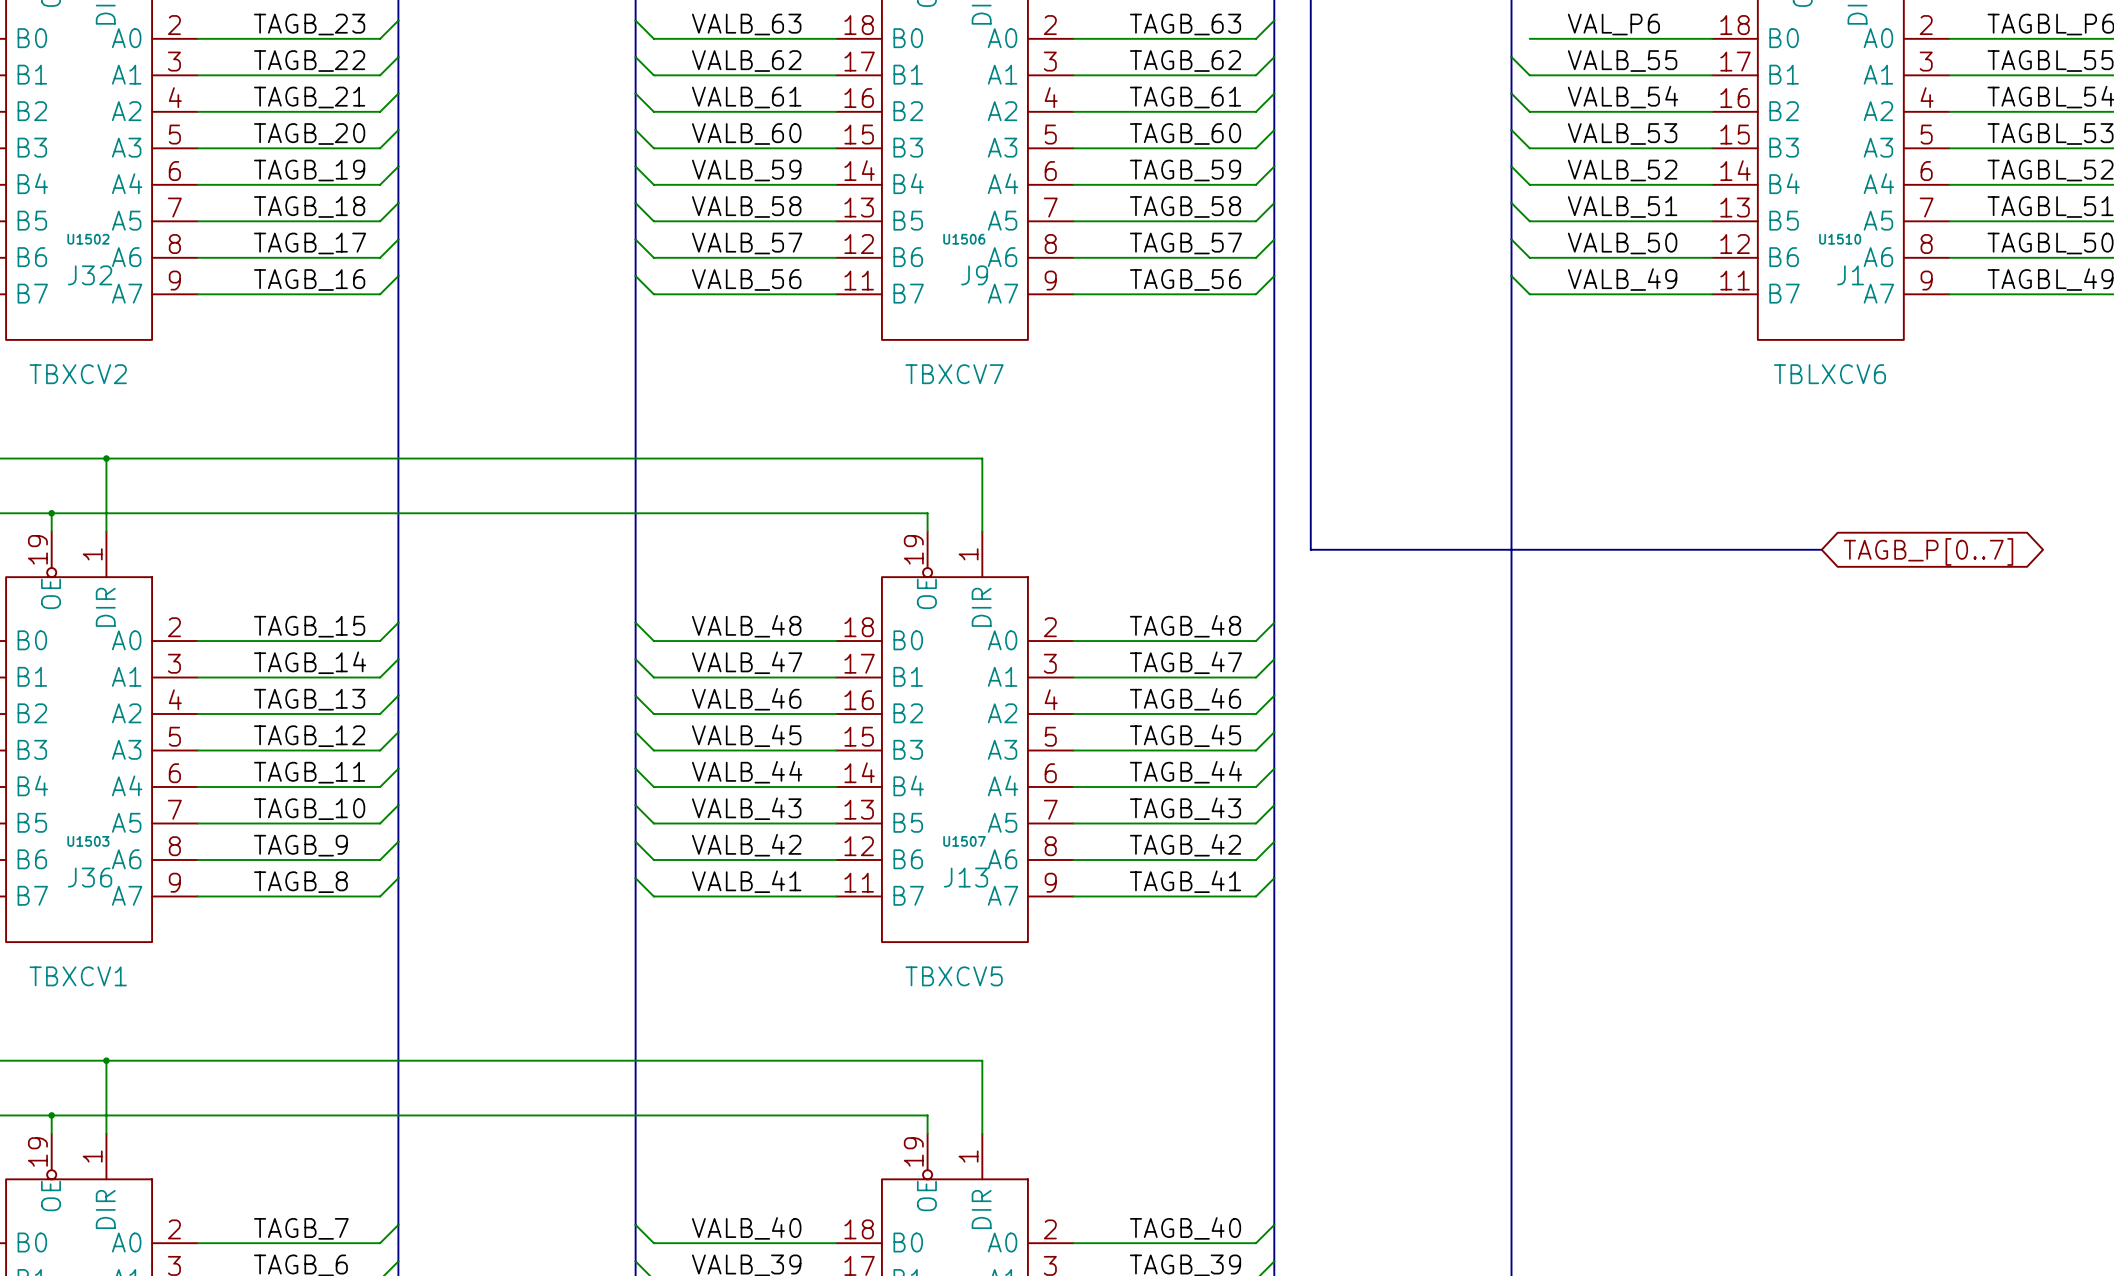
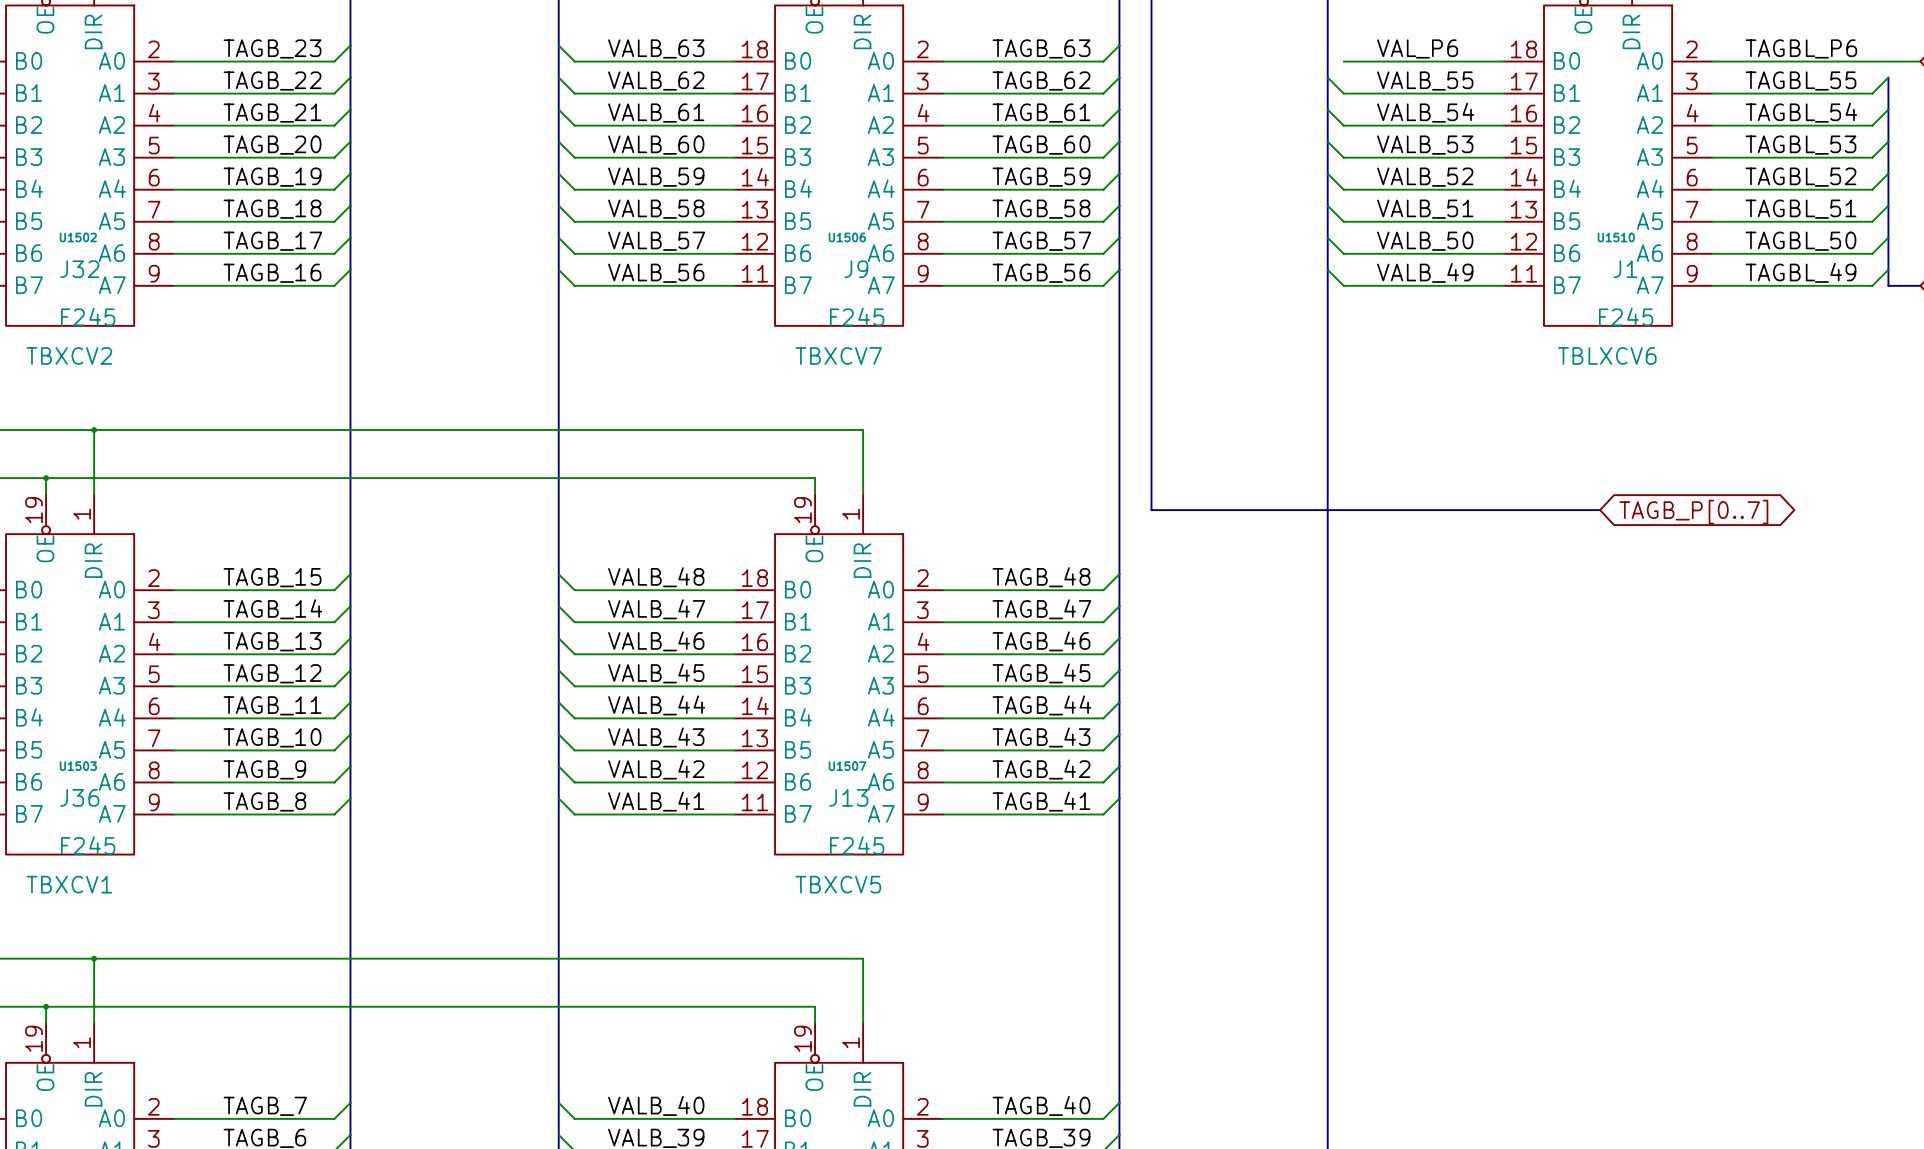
U1502 value: none -> F245 (88, 316)
U1506 value: none -> F245 (857, 316)
U1510 value: none -> F245 (1626, 316)
U1503 value: none -> F245 (88, 845)
U1507 value: none -> F245 (857, 845)

